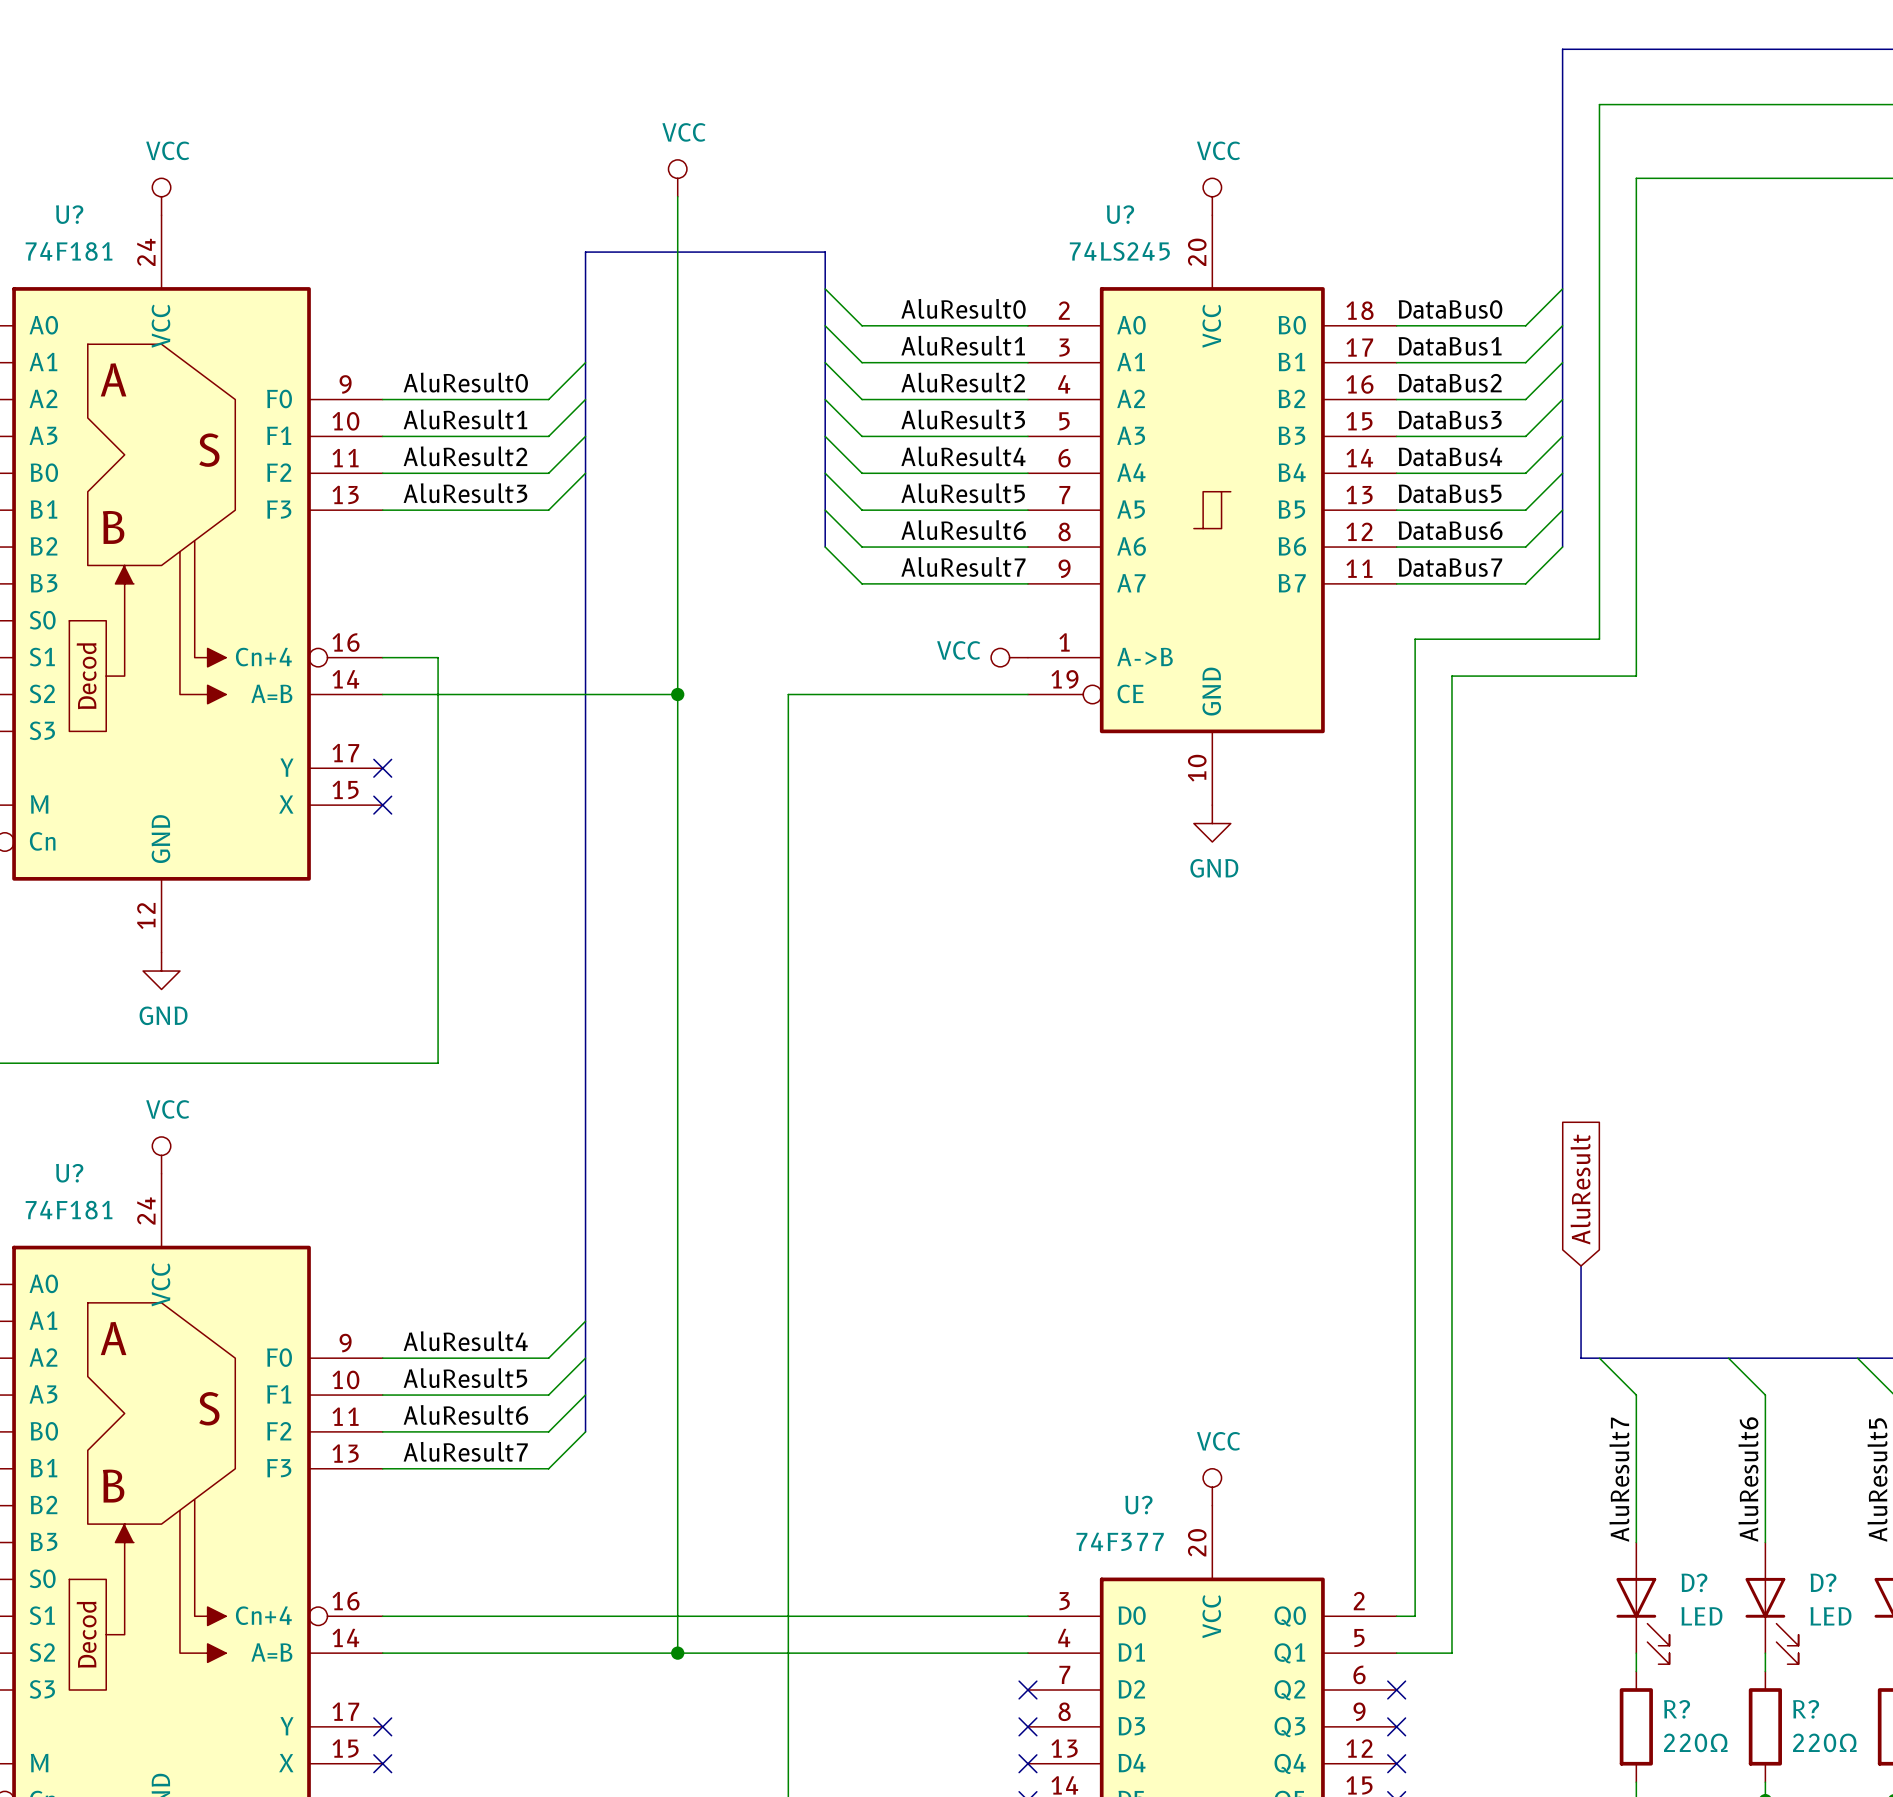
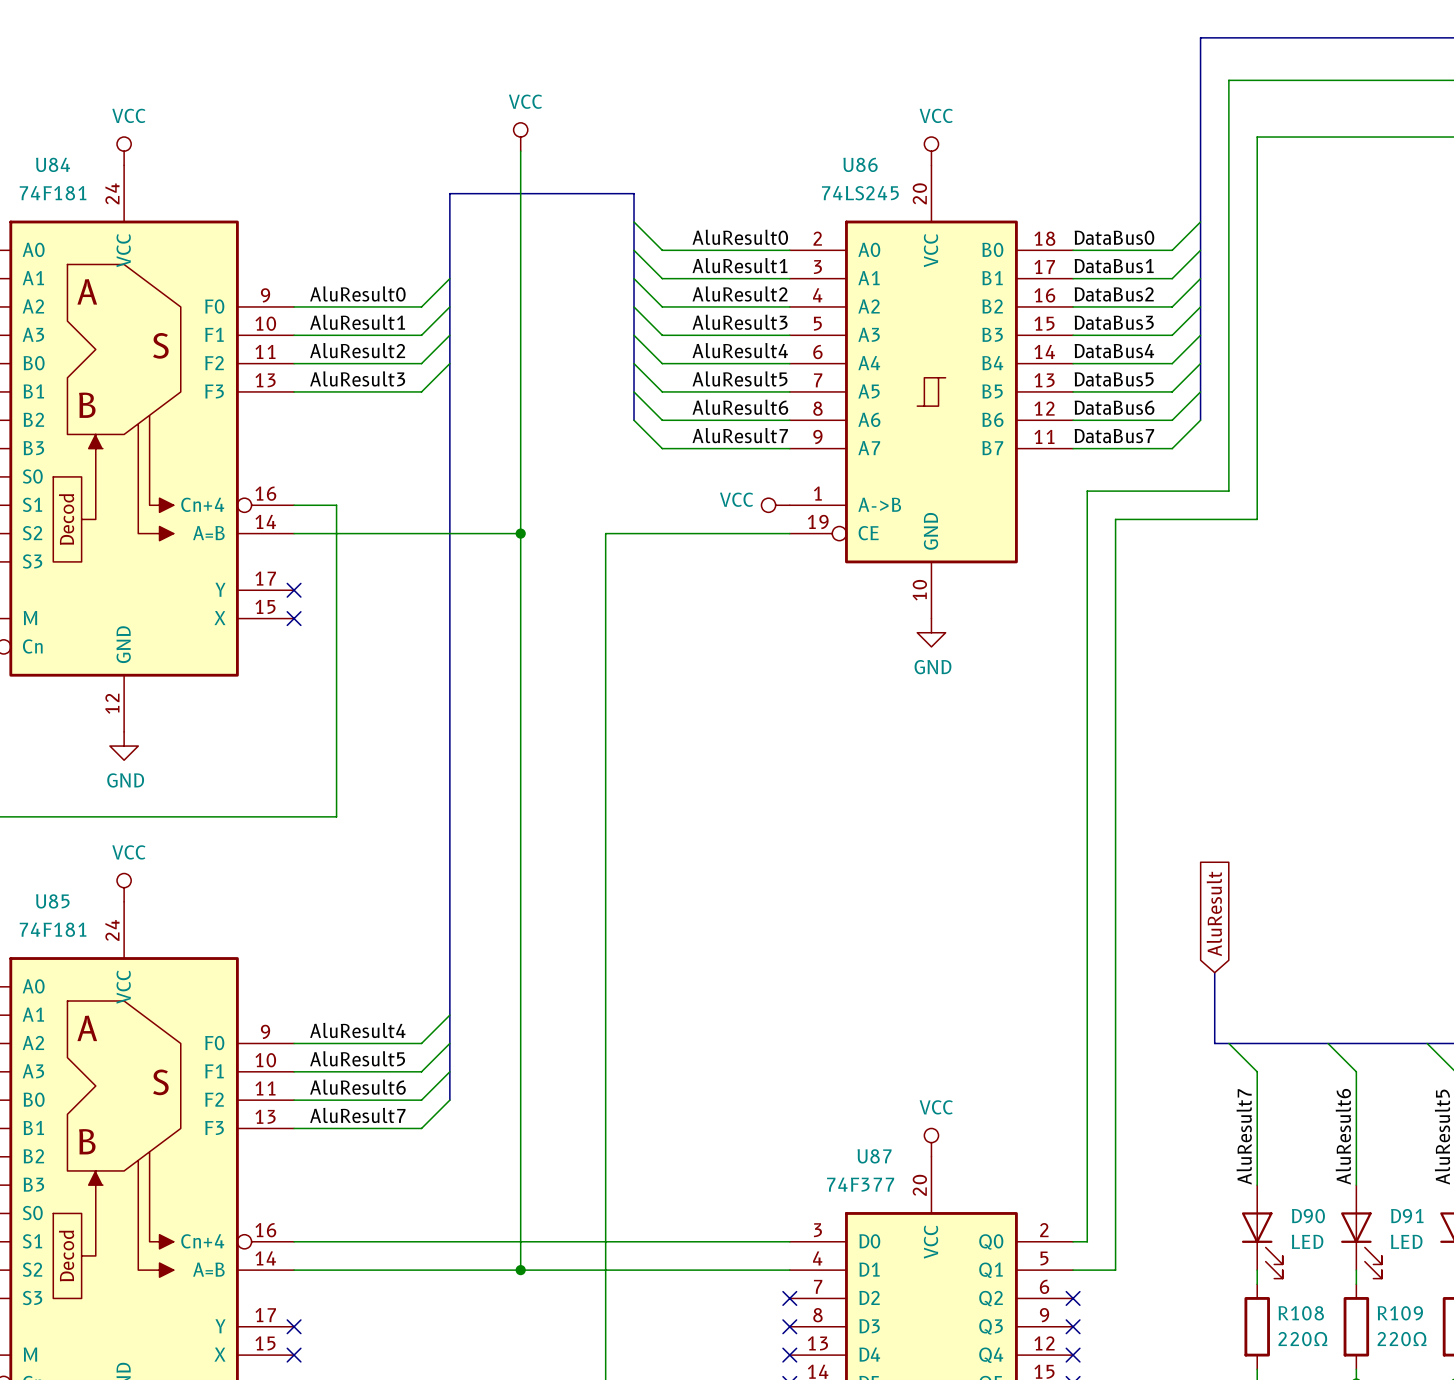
U? name: U? (69, 214) -> U84 (53, 164)
U? name: U? (1120, 214) -> U86 (860, 164)
U? name: U? (69, 1173) -> U85 (52, 901)
U? name: U? (1138, 1505) -> U87 (874, 1156)
D? name: D? (1694, 1582) -> D90 (1308, 1216)
D? name: D? (1823, 1582) -> D91 (1407, 1216)
R? name: R? (1677, 1709) -> R108 (1301, 1313)
R? name: R? (1806, 1709) -> R109 (1400, 1313)

